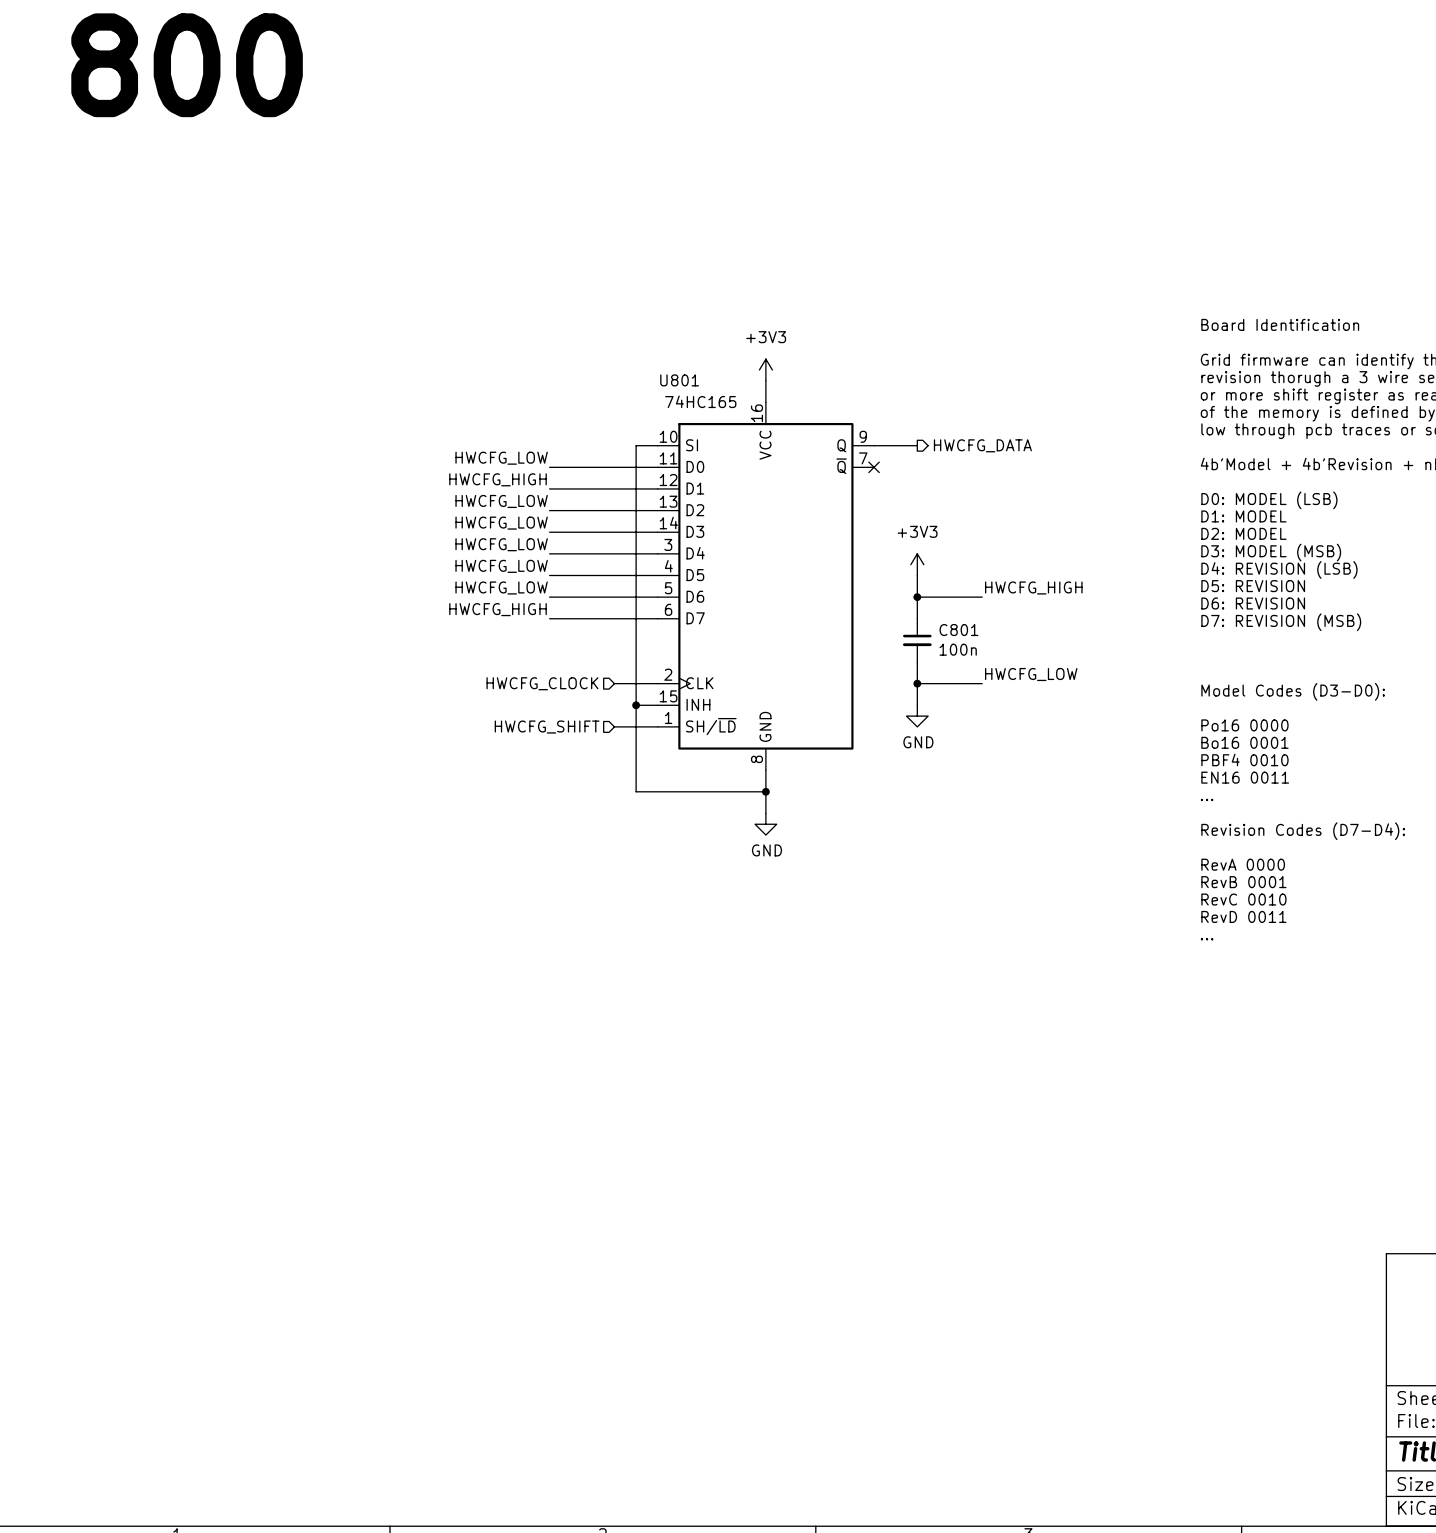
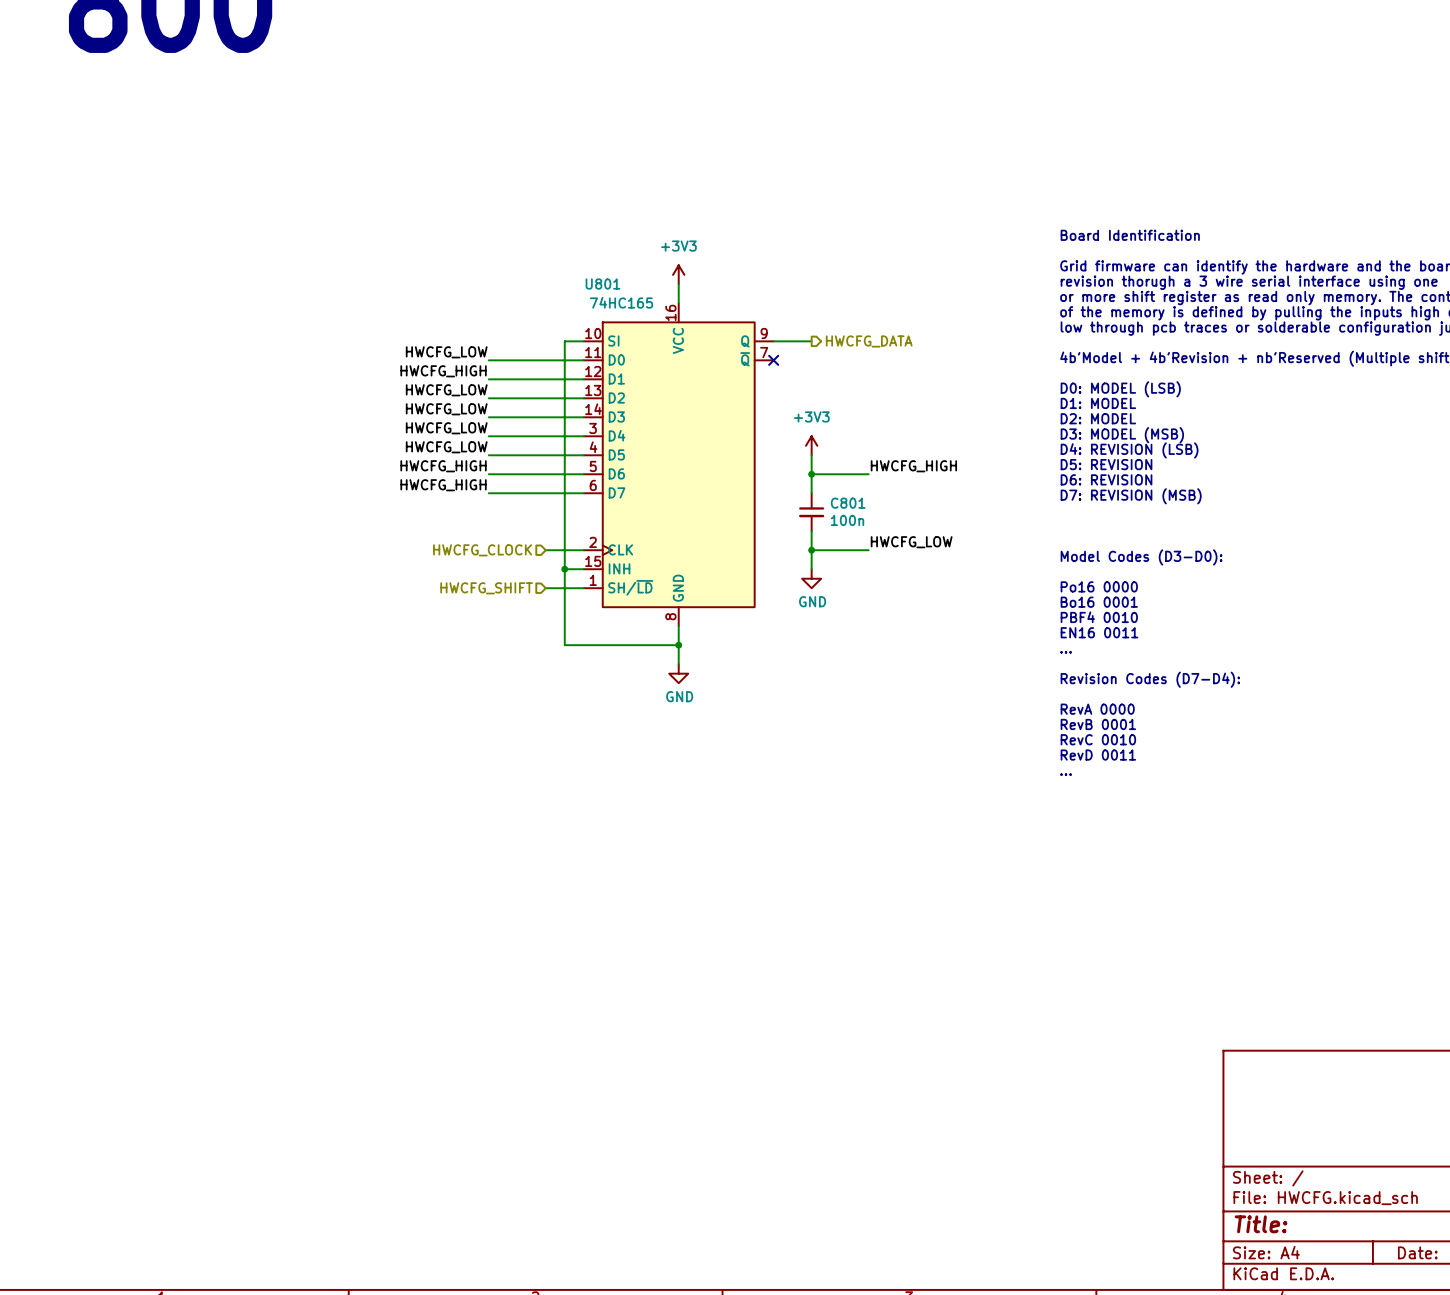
label: HWCFG_LOW (501, 587) -> HWCFG_HIGH (443, 466)

